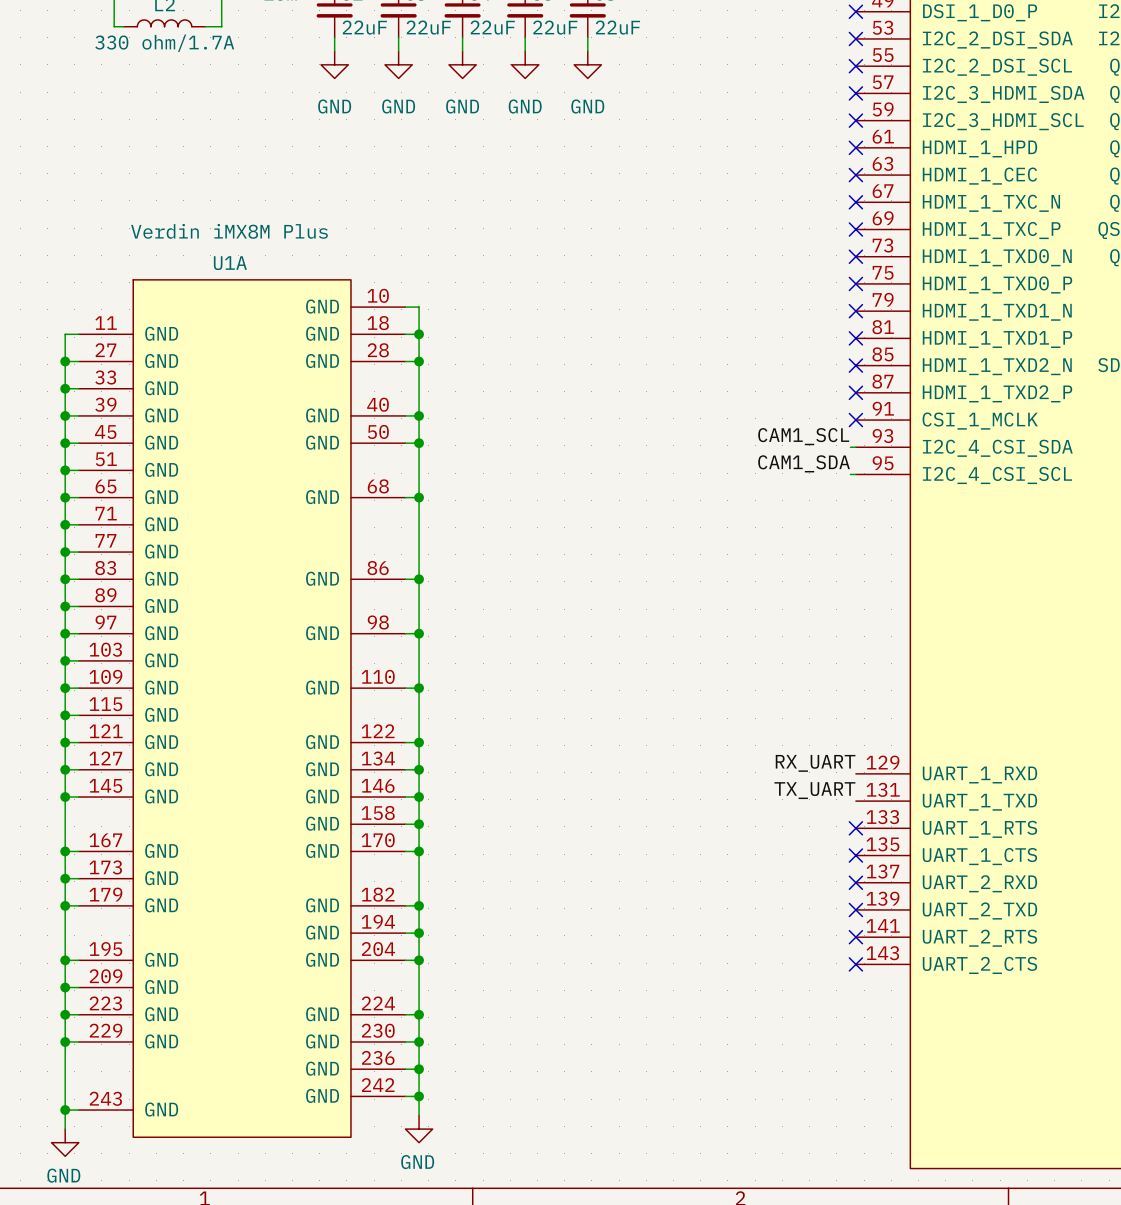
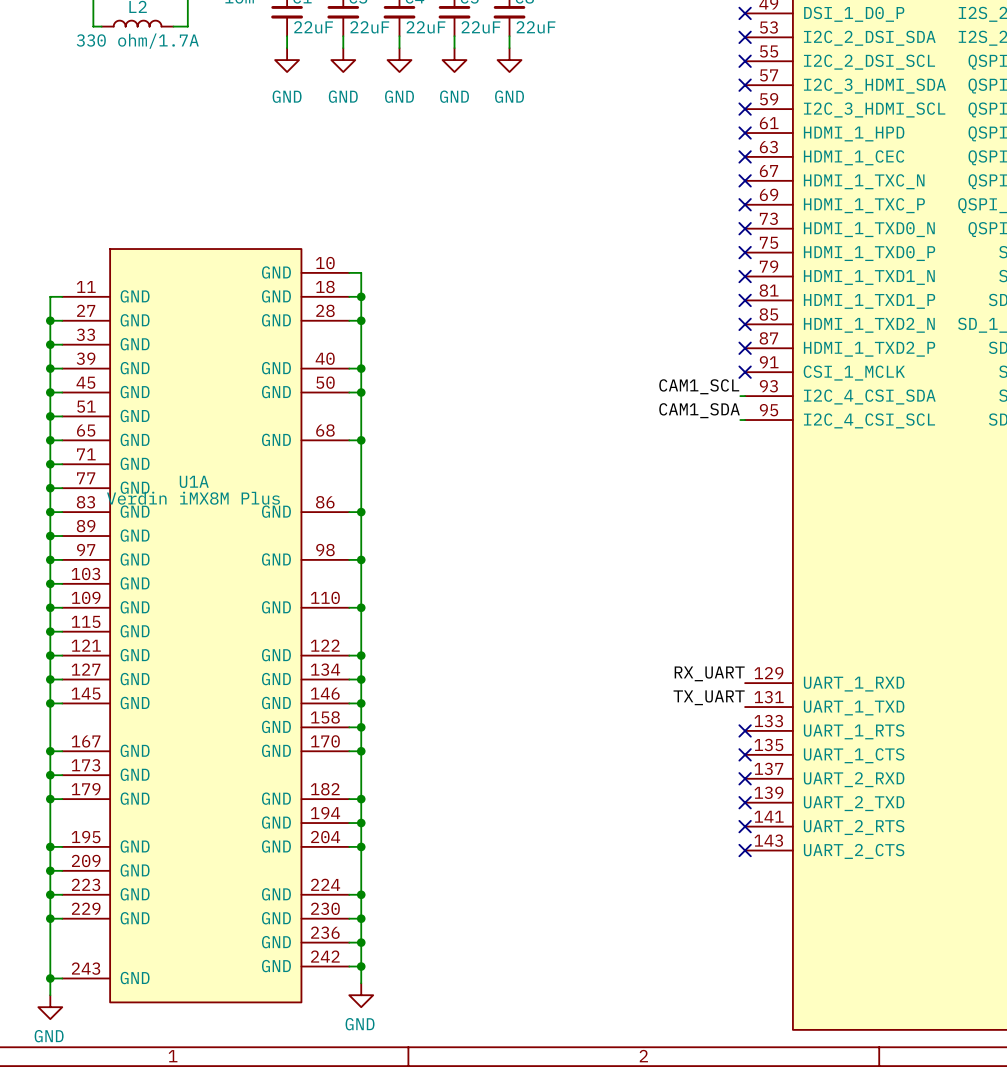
U1A value position: Verdin iMX8M Plus (229, 231) -> Verdin iMX8M Plus (193, 498)
U1A name position: U1A (230, 263) -> U1A (194, 481)

